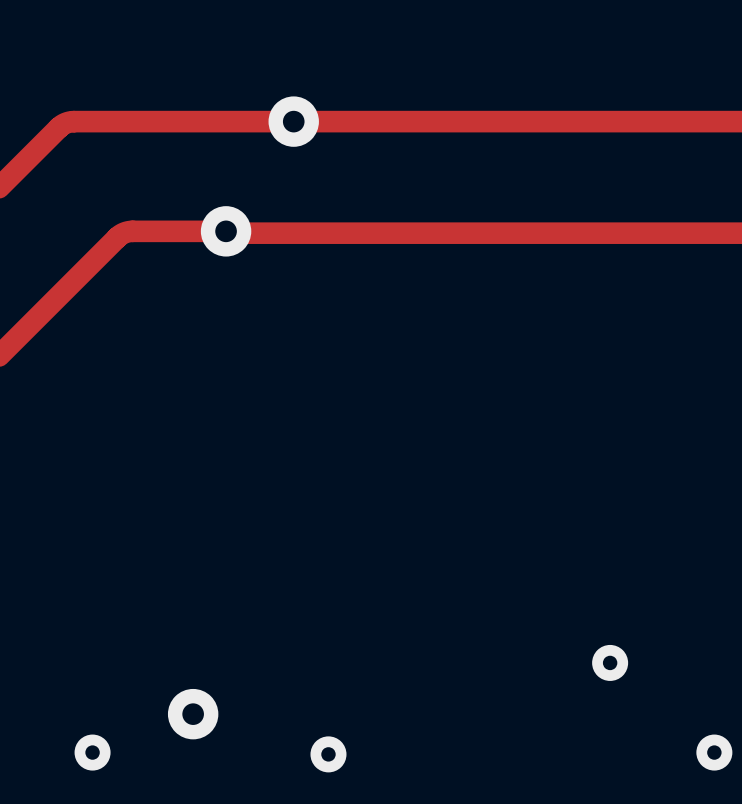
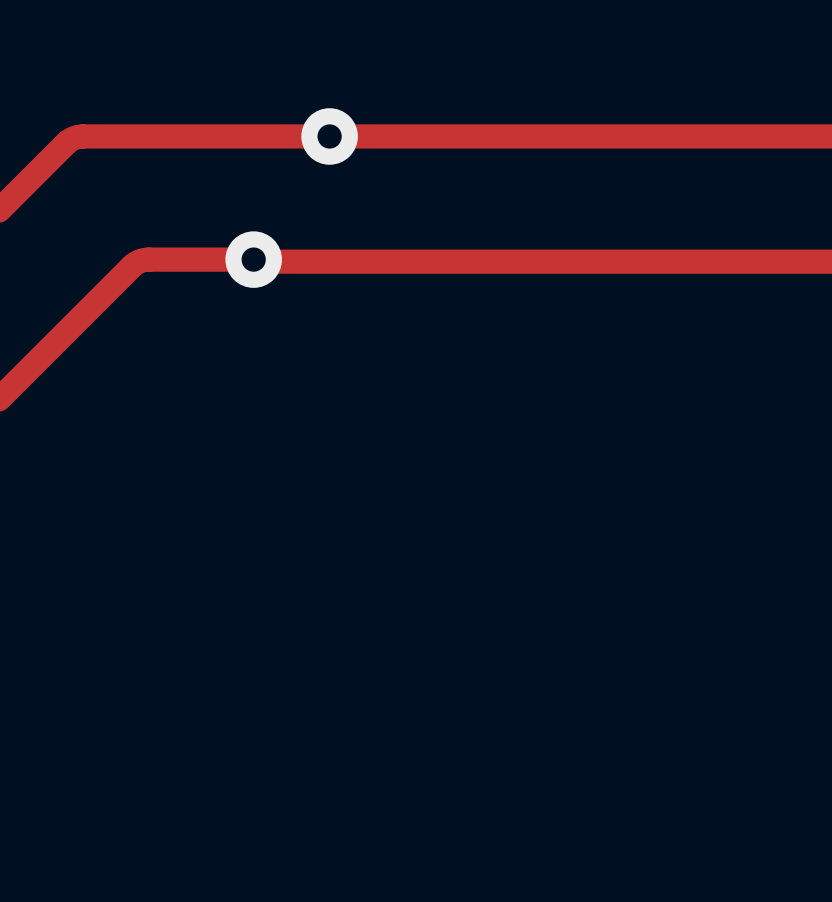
via: (610, 662) -> none
via: (193, 714) -> none
via: (92, 752) -> none
via: (714, 752) -> none
via: (328, 754) -> none

